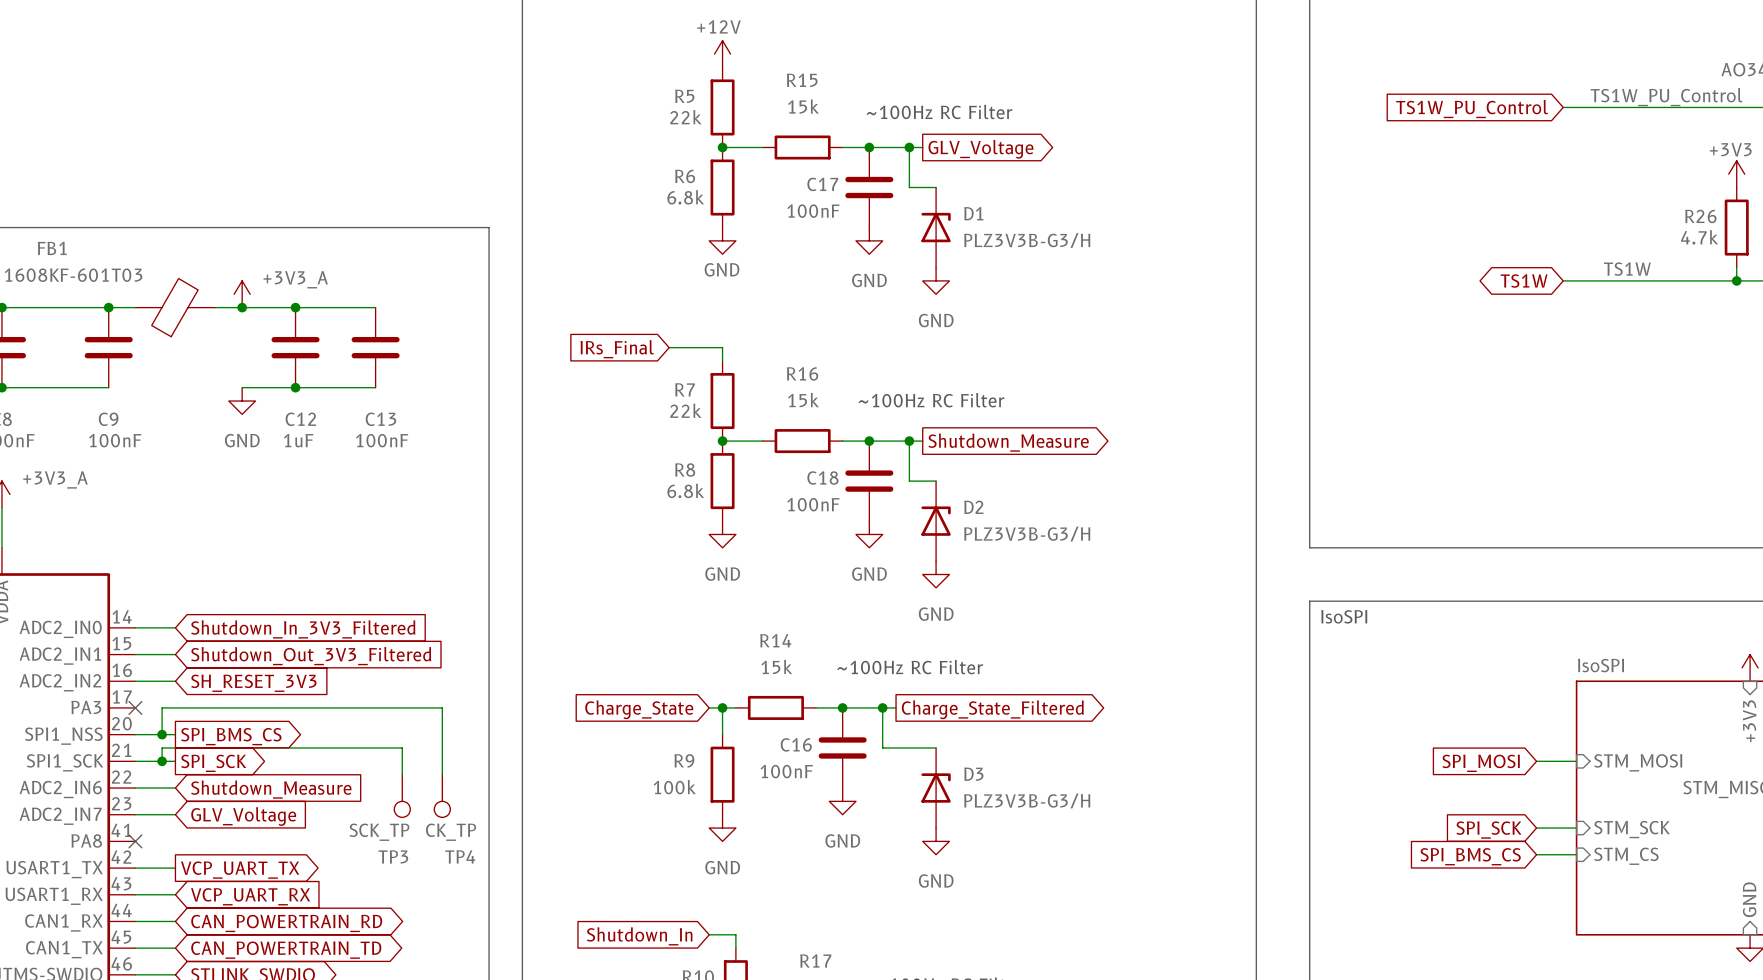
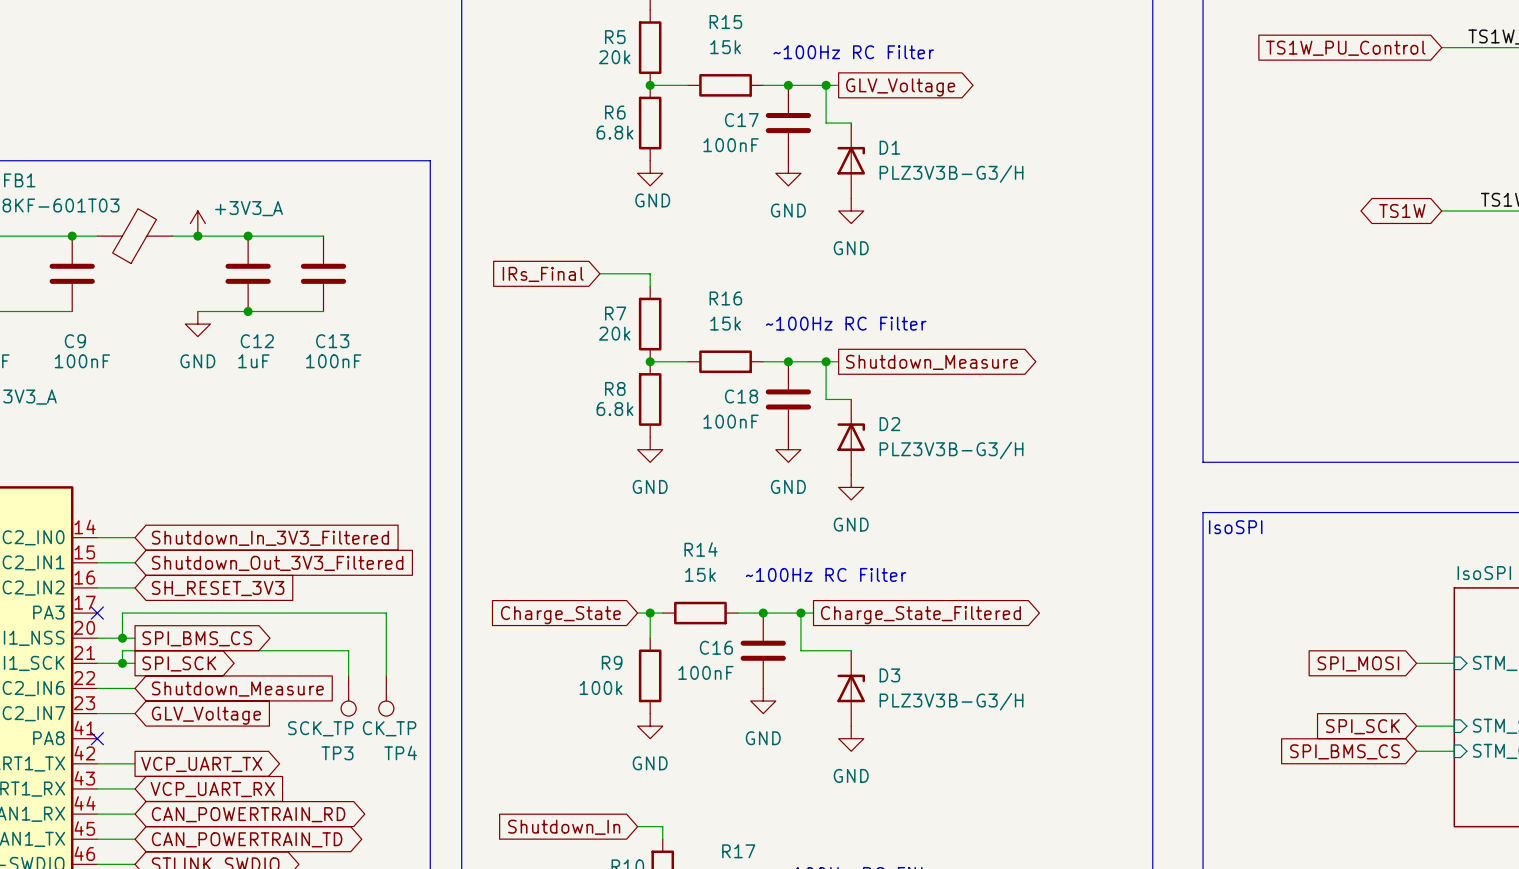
R5 value: 22k (685, 117) -> 20k (614, 57)
R7 value: 22k (685, 410) -> 20k (614, 333)

